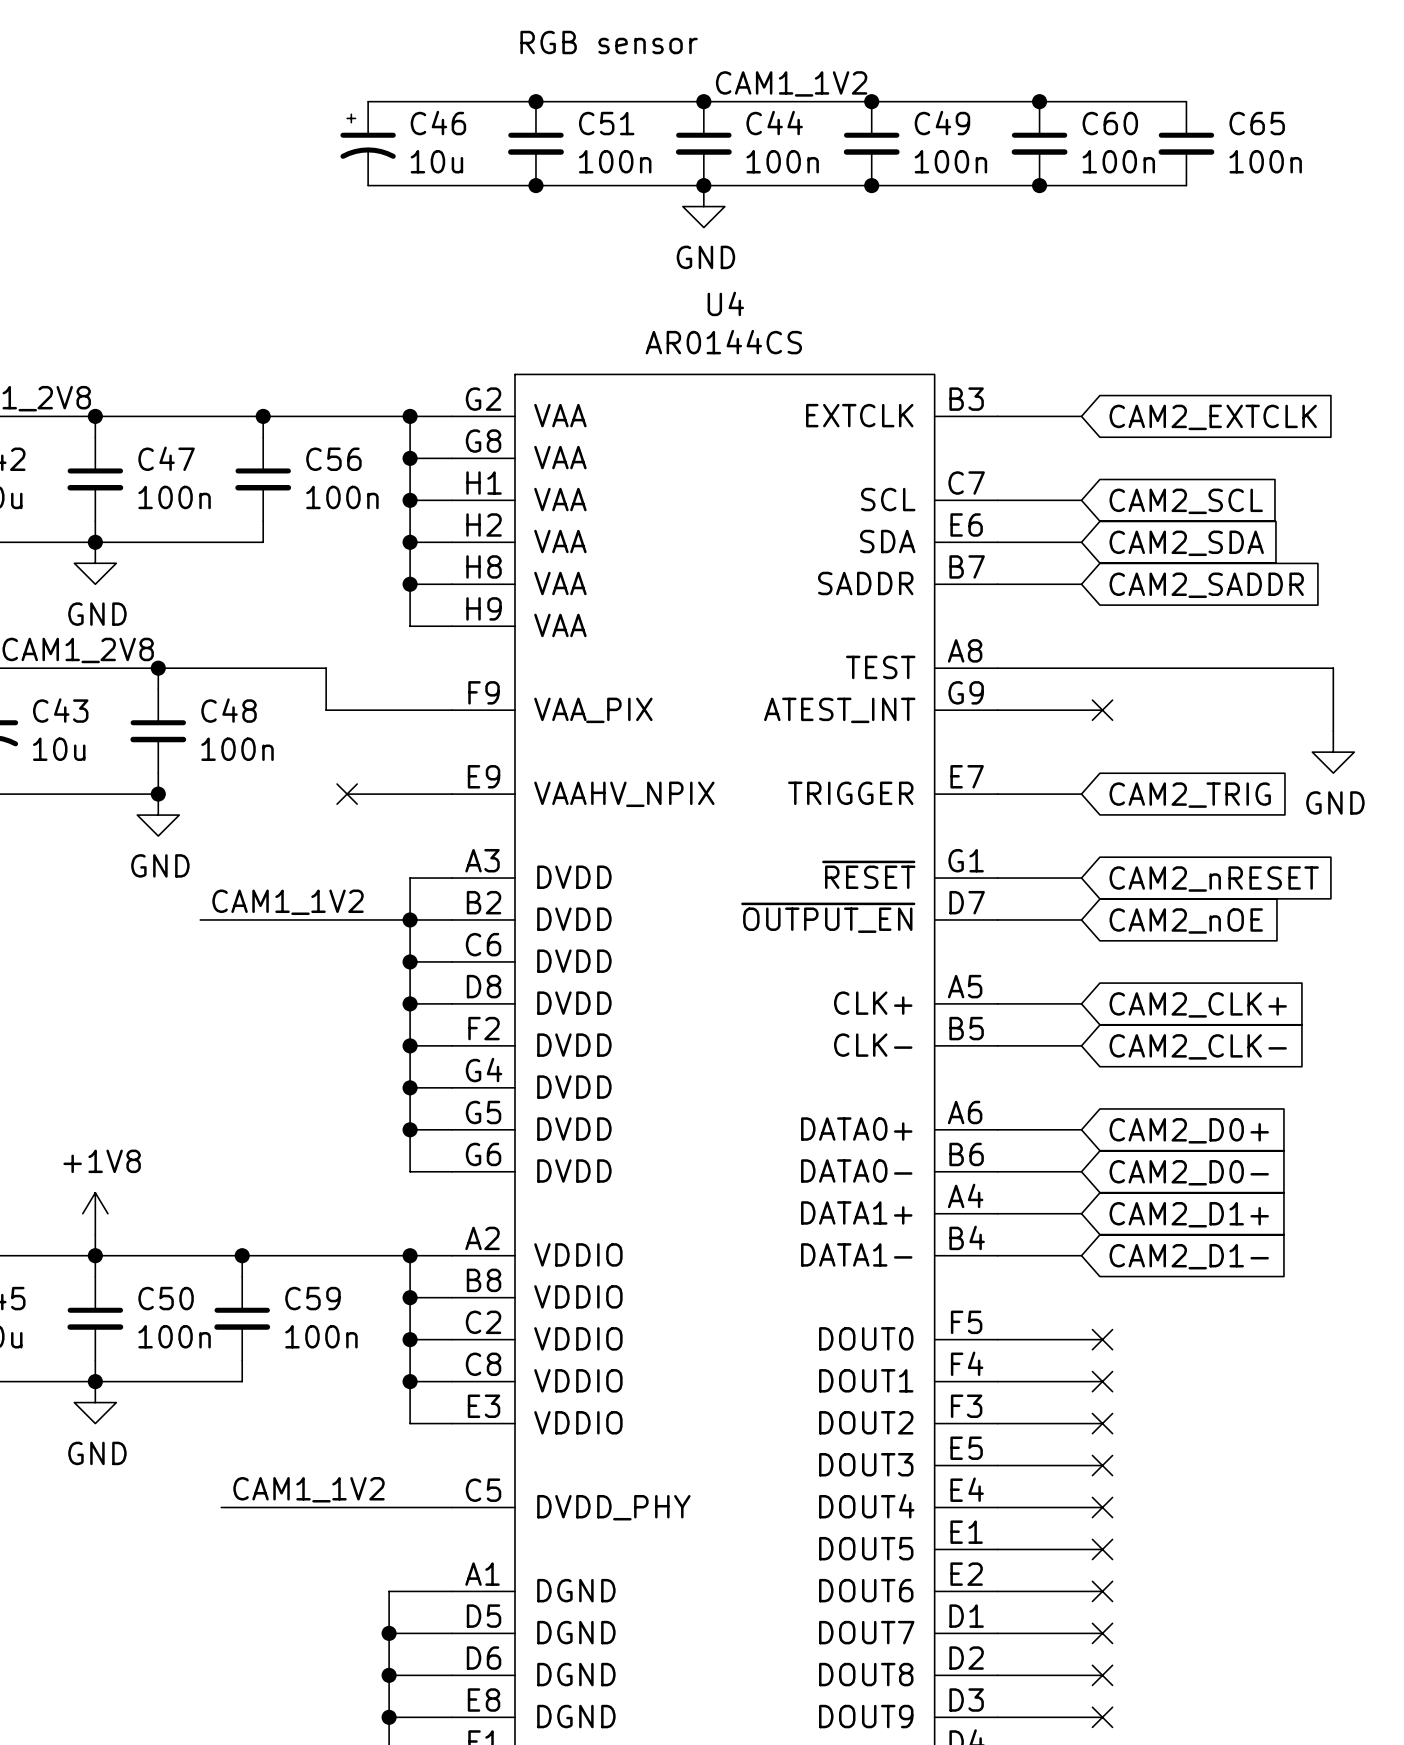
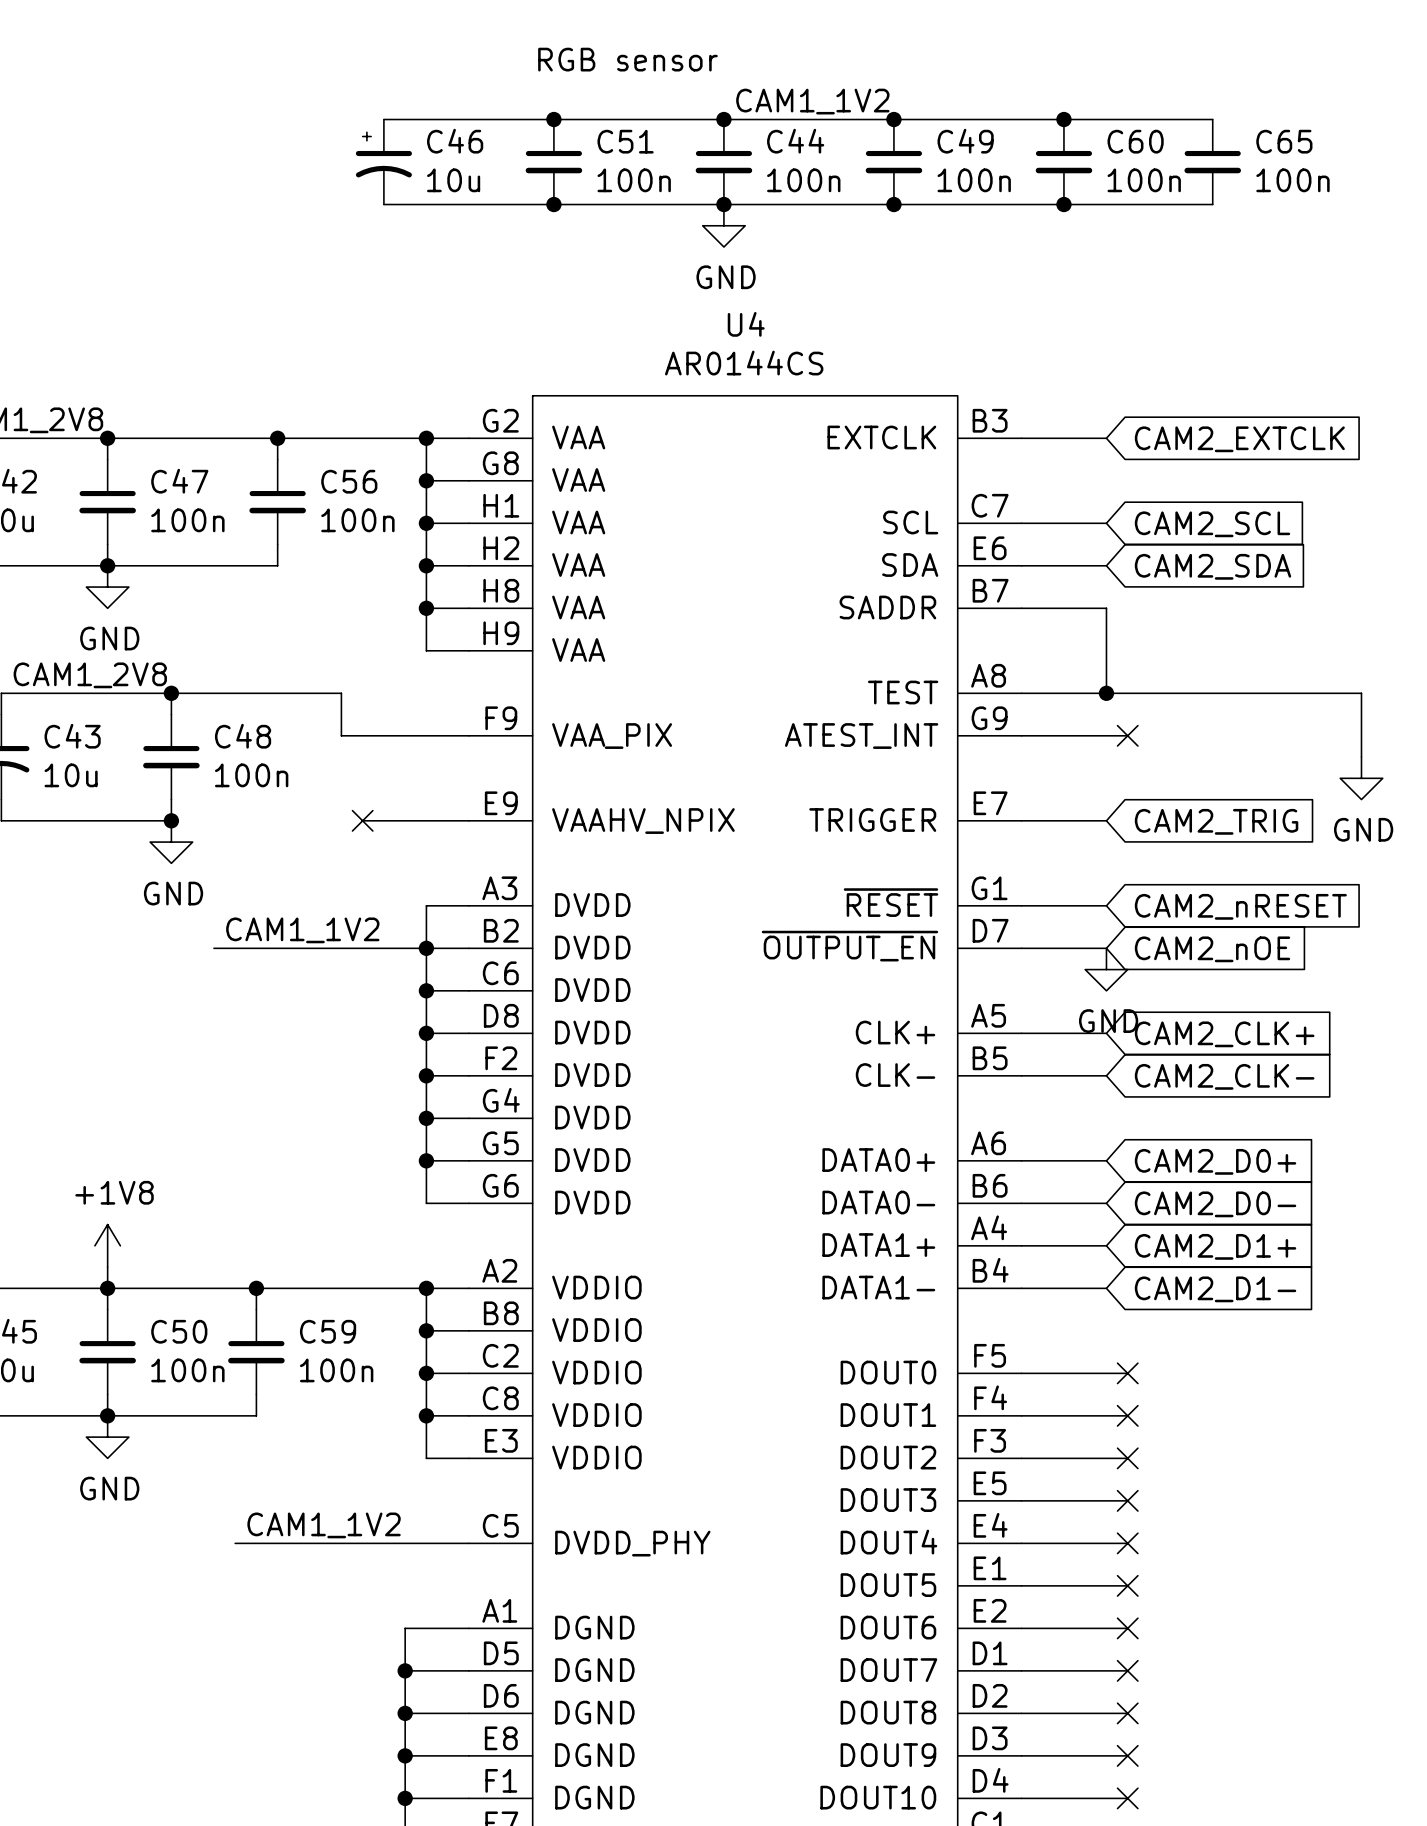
wire: none -> (1106, 608) (1106, 693)
global label: CAM2_SADDR (1206, 585) -> none
junction: none -> (1106, 693)
power symbol: none -> GND (1106, 969)

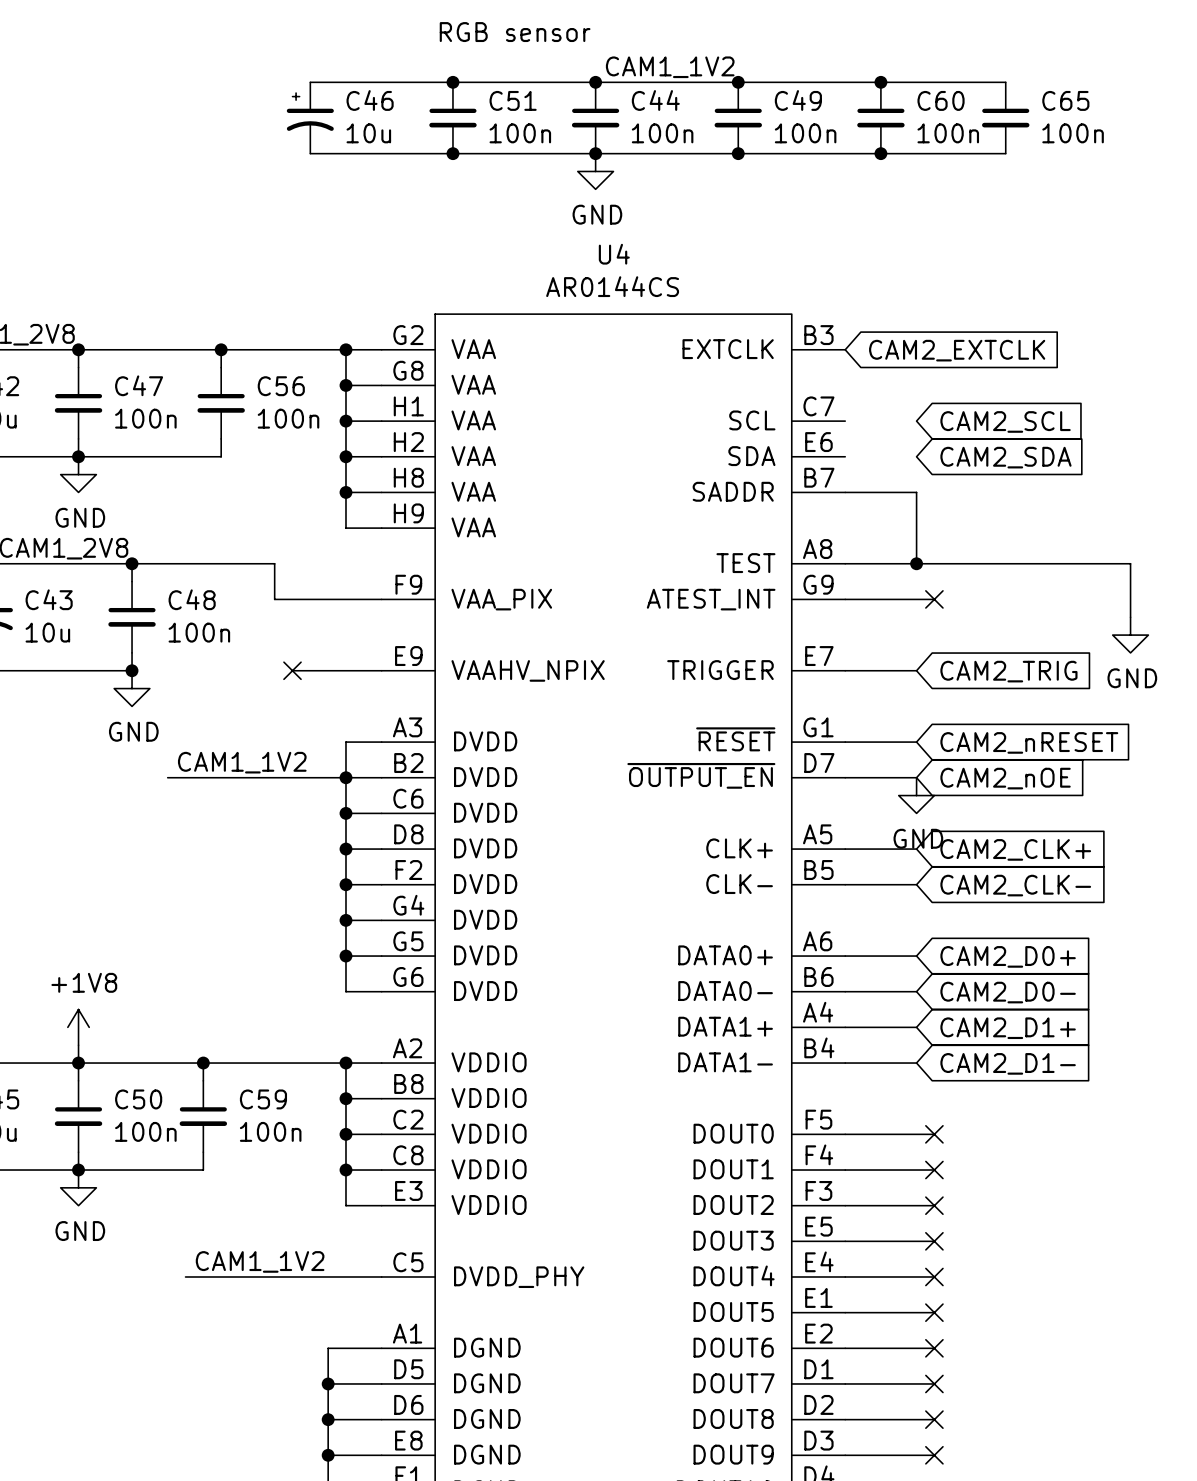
wire: (1021, 438) (1106, 438) -> none
global label position: CAM2_EXTCLK (1239, 439) -> CAM2_EXTCLK (957, 350)
wire: (1021, 523) (1106, 523) -> none
wire: (1021, 565) (1106, 565) -> none

